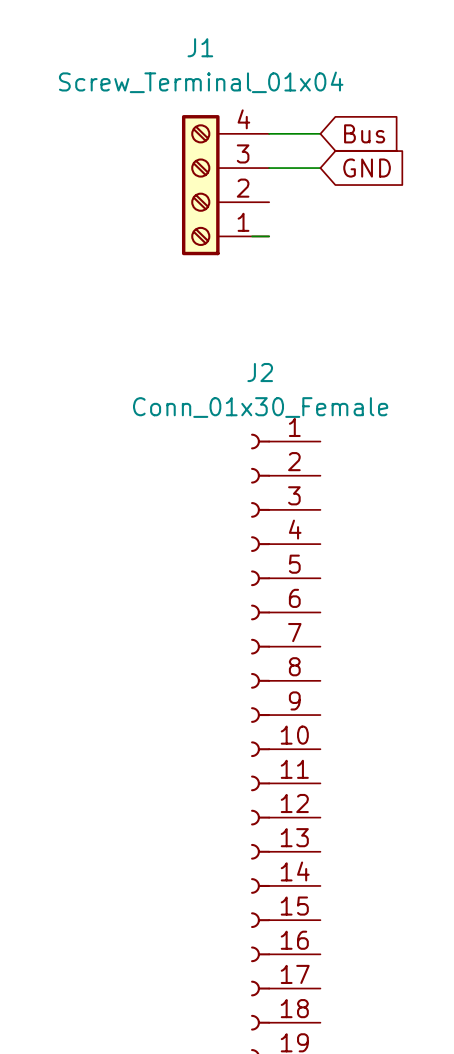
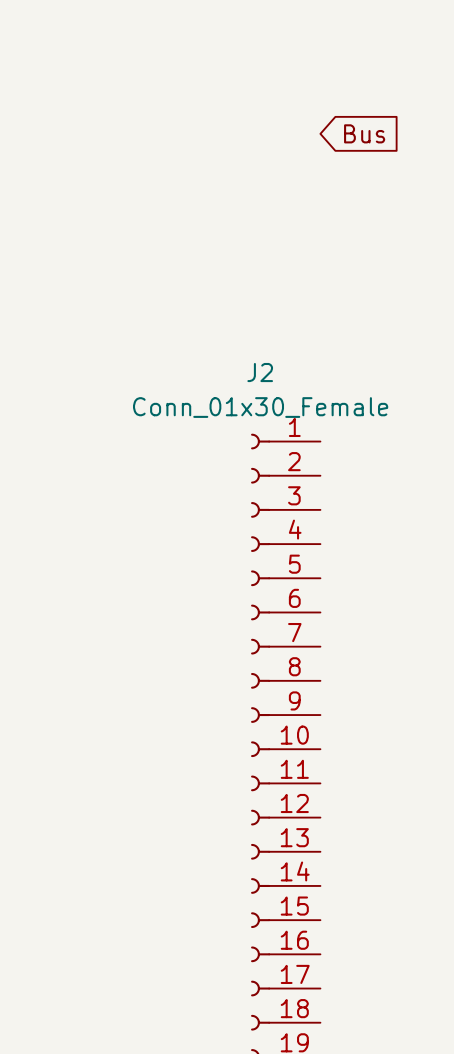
wire: (269, 133) (320, 133) -> none
wire: (269, 168) (320, 168) -> none
global label: GND (367, 168) -> none
J1: Screw_Terminal_01x04 (225, 185) -> none
wire: (252, 236) (269, 236) -> none

